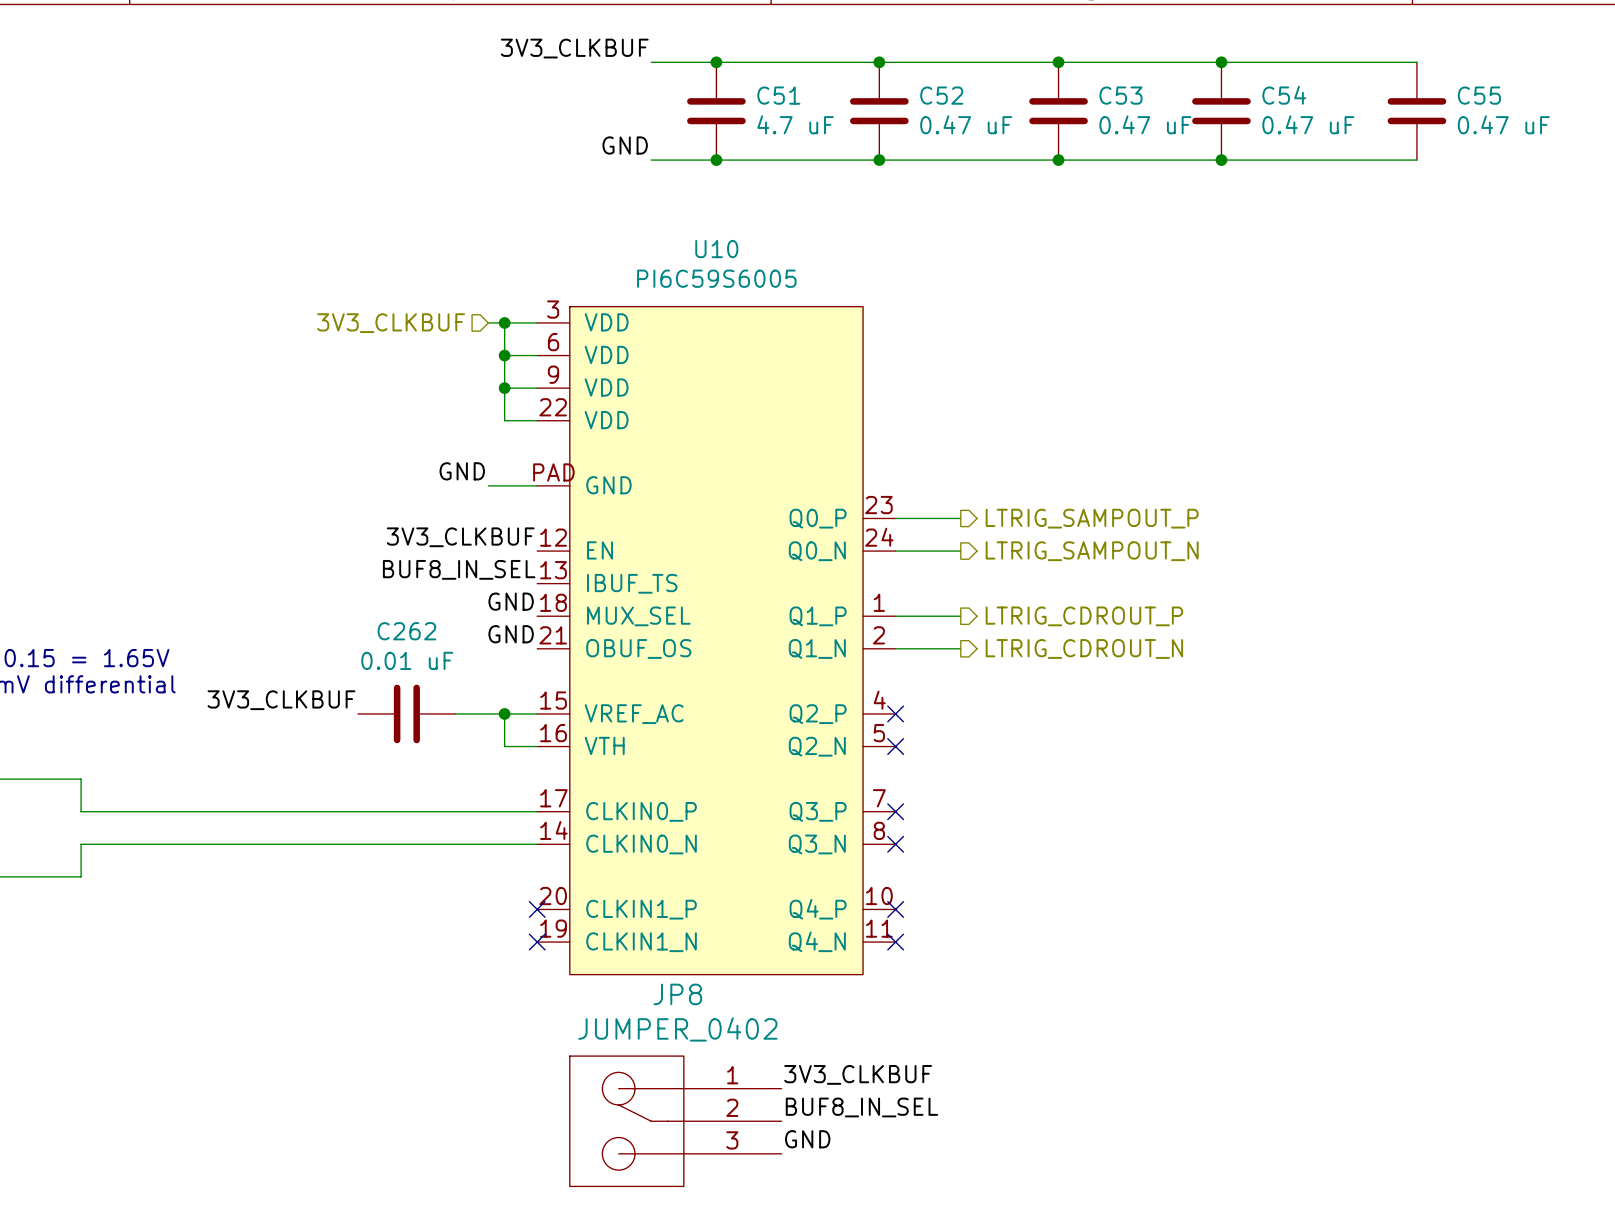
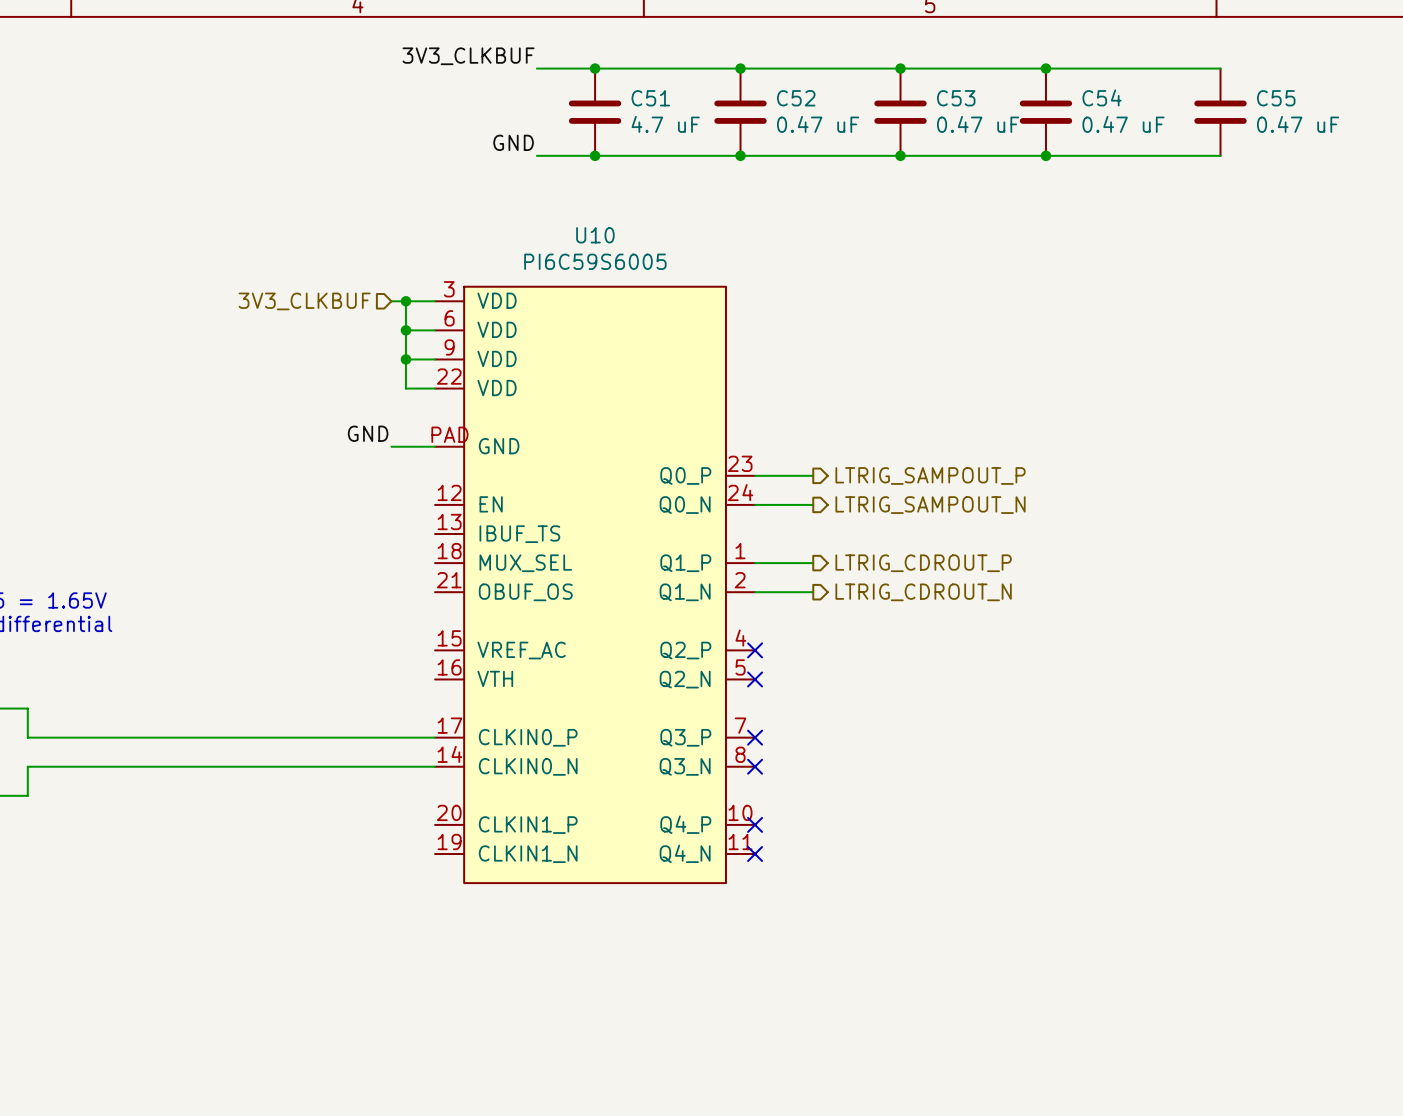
label: 3V3_CLKBUF (460, 537) -> none
label: BUF8_IN_SEL (459, 569) -> none
label: GND (511, 601) -> none
label: GND (511, 634) -> none
label: 3V3_CLKBUF (281, 700) -> none
C262: 0.01 uF (406, 713) -> none
wire: (455, 713) (537, 713) -> none
wire: (504, 713) (504, 746) (537, 746) -> none
junction: (504, 713) -> none
no-connect mark: (537, 909) -> none
no-connect mark: (537, 942) -> none
label: 3V3_CLKBUF (858, 1074) -> none
label: BUF8_IN_SEL (862, 1107) -> none
JP8: JUMPER_0402 (675, 1121) -> none
label: GND (807, 1139) -> none

